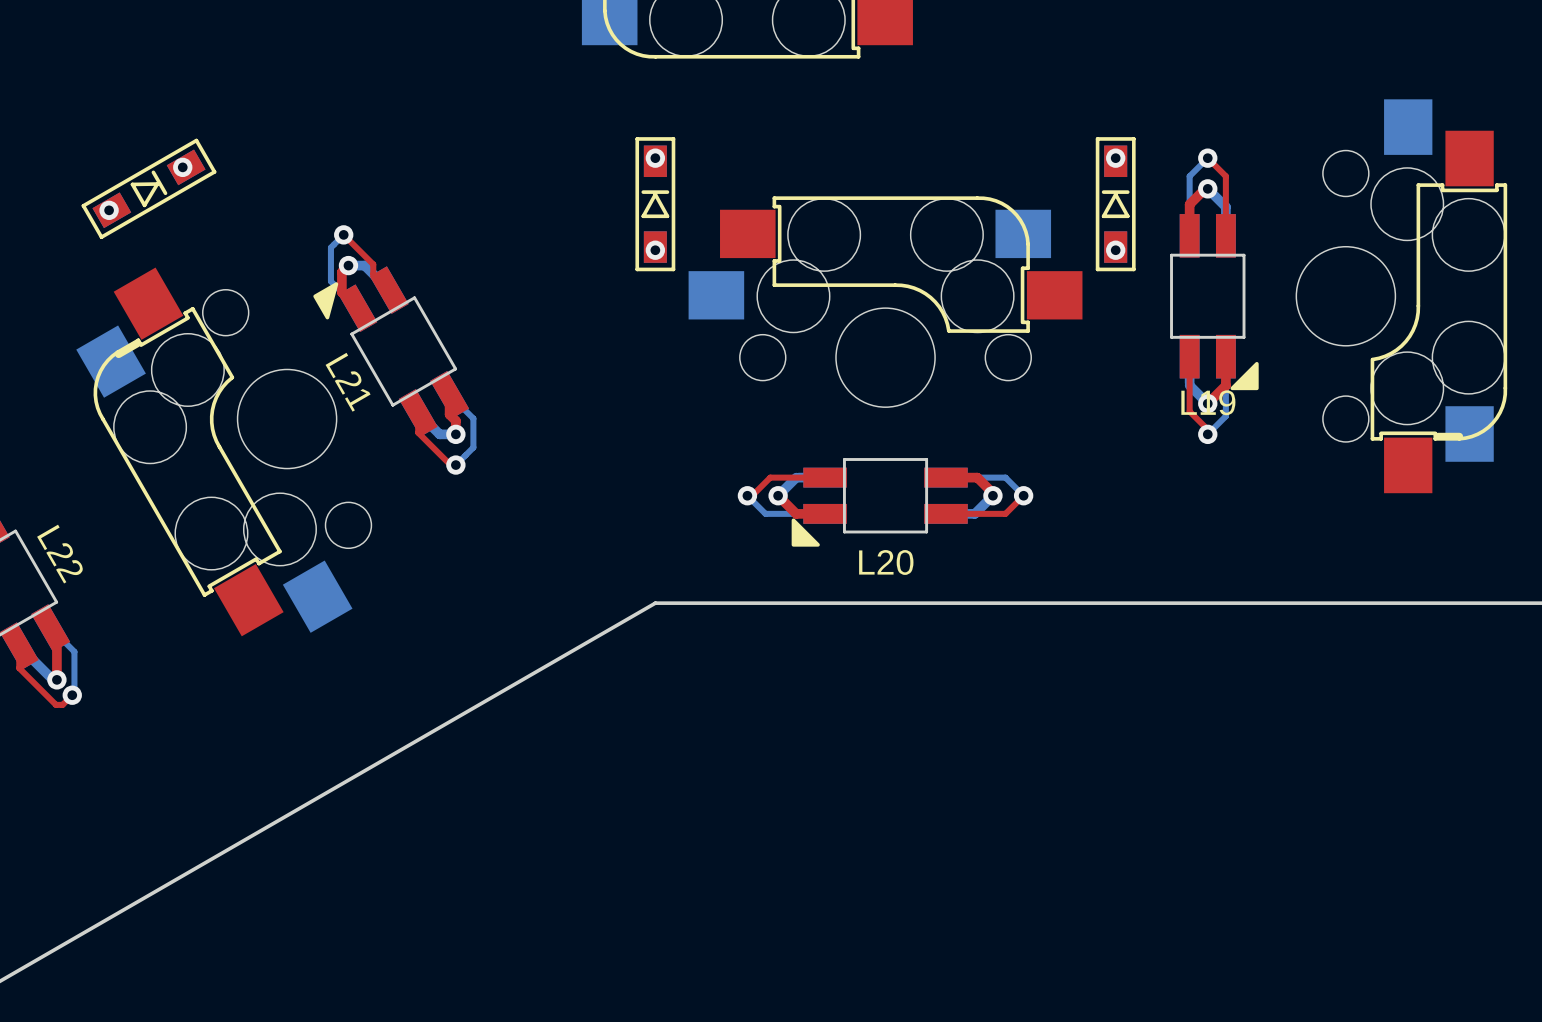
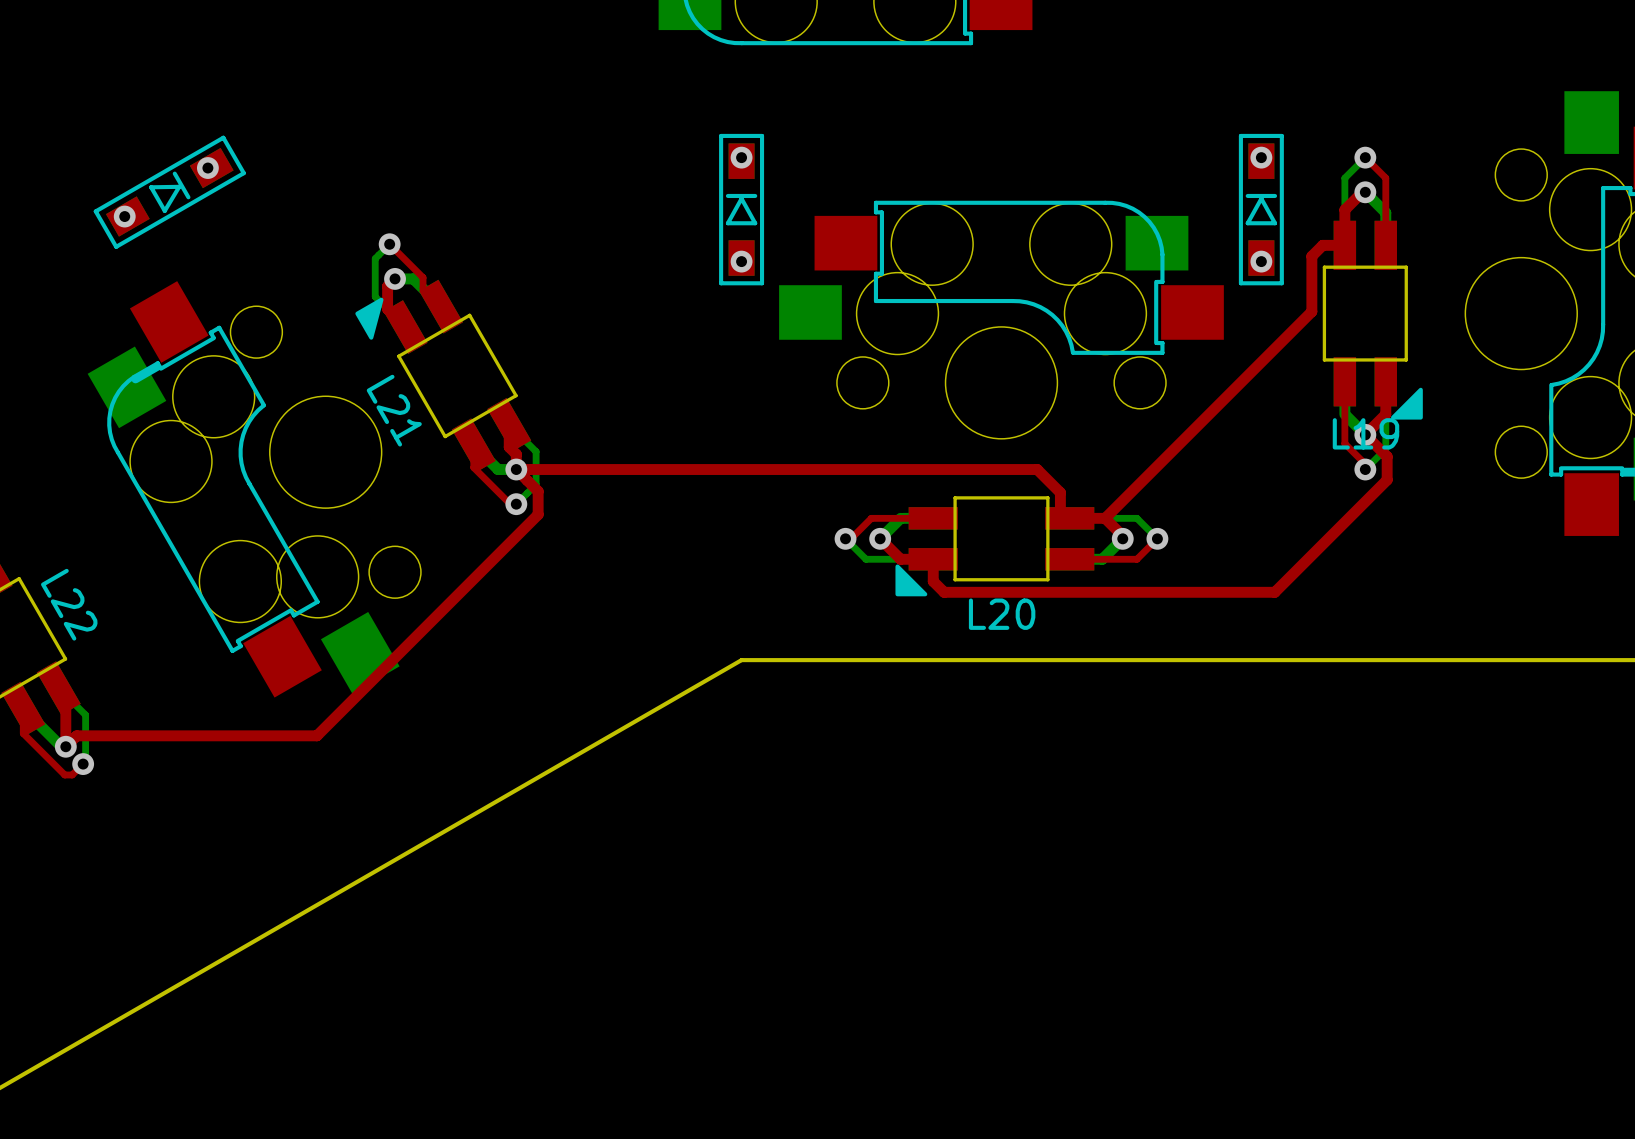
top track: none -> (1344, 245) (1322, 245) (1311, 256) (1311, 311) (1105, 518)
top track: none -> (1365, 434) (1387, 456) (1387, 479) (1274, 592) (944, 592) (933, 581) (933, 559)
top track: none -> (1069, 518) (1060, 511) (1060, 492) (1037, 469) (516, 469) (538, 491) (538, 514) (316, 735) (76, 735) (65, 746)

